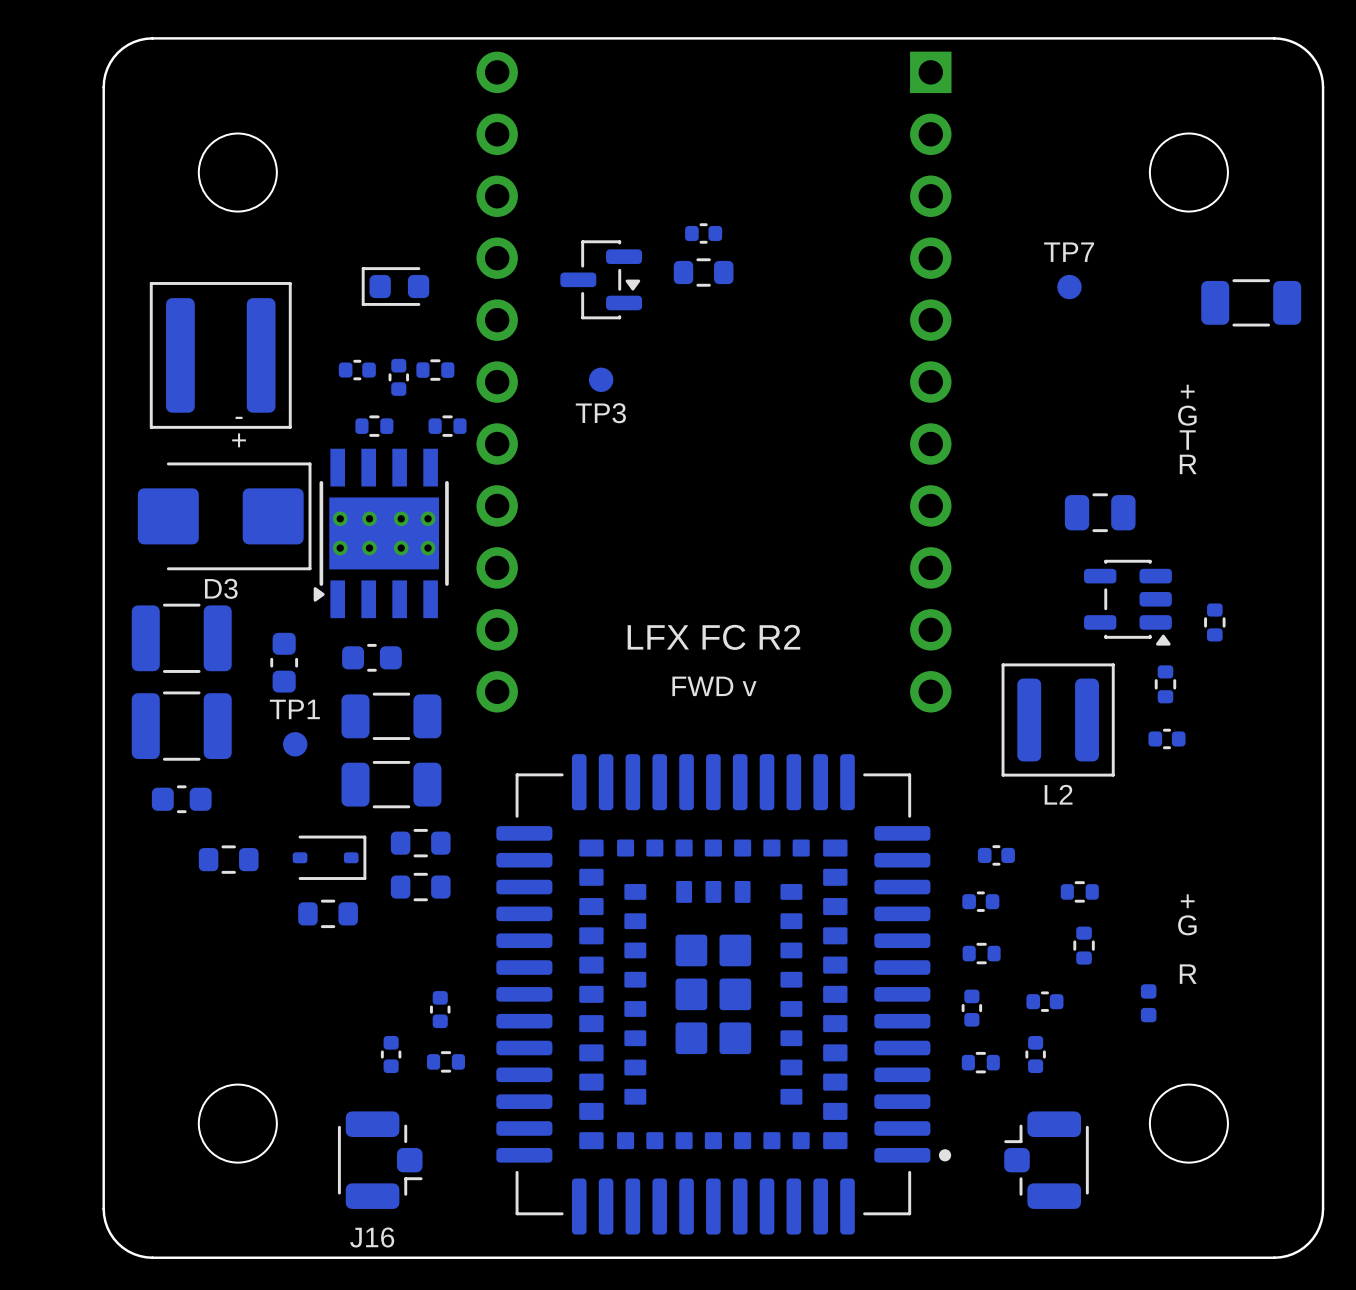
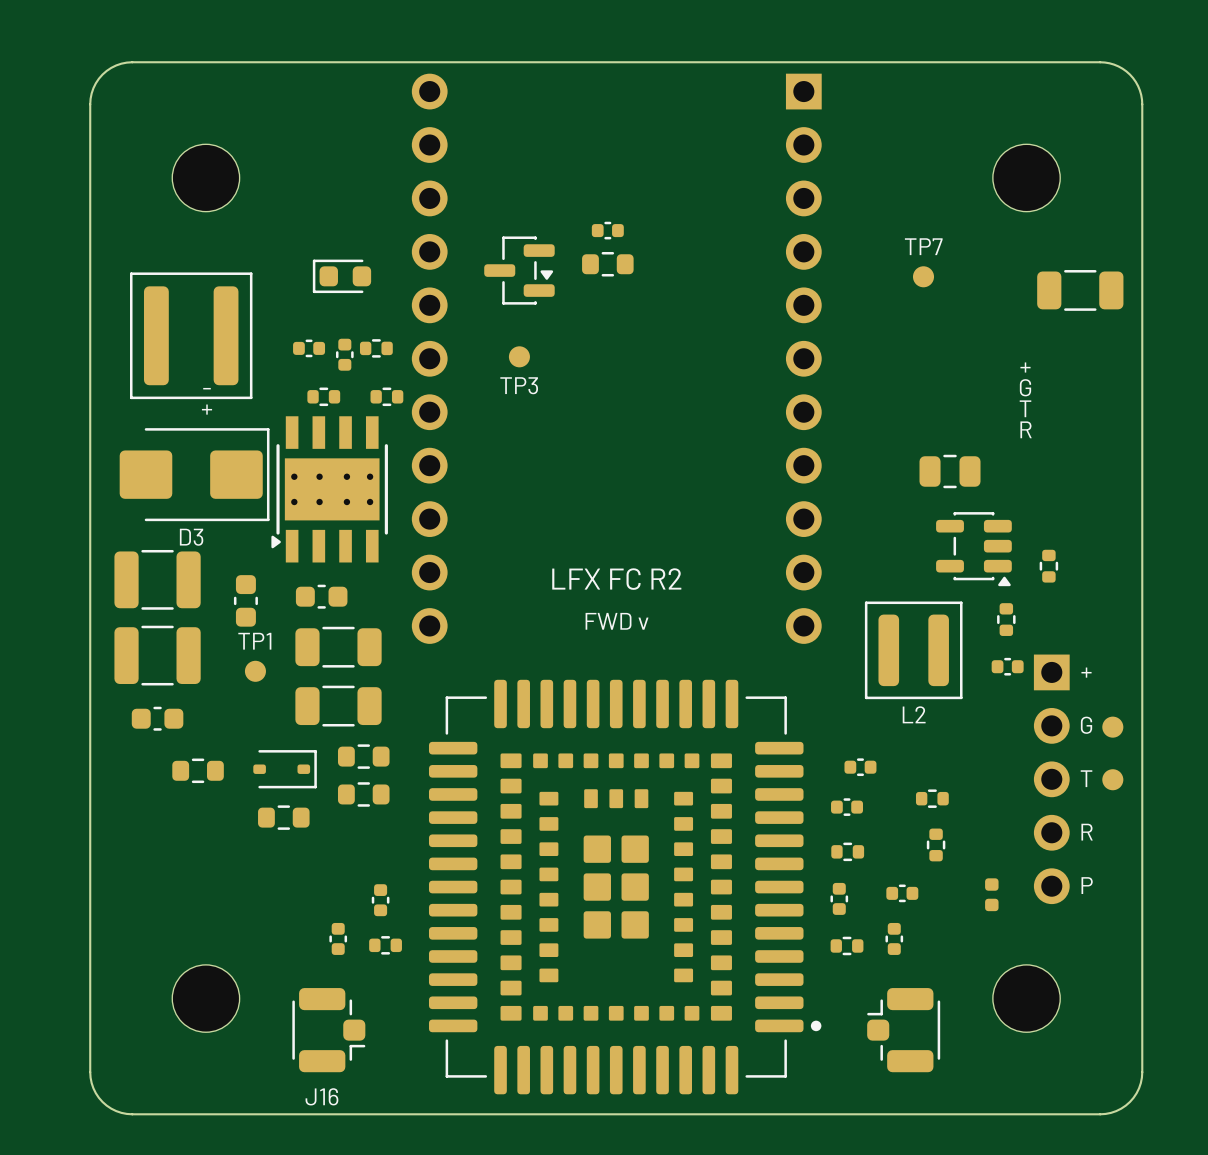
part: none -> (1112, 727)
text: none -> T (1086, 778)
part: none -> (1051, 779)
part: none -> (1112, 779)
text position: + (1187, 901) -> + (1086, 672)
text position: G (1187, 925) -> G (1086, 725)
text position: R (1188, 974) -> R (1087, 832)
text: none -> P (1087, 885)

